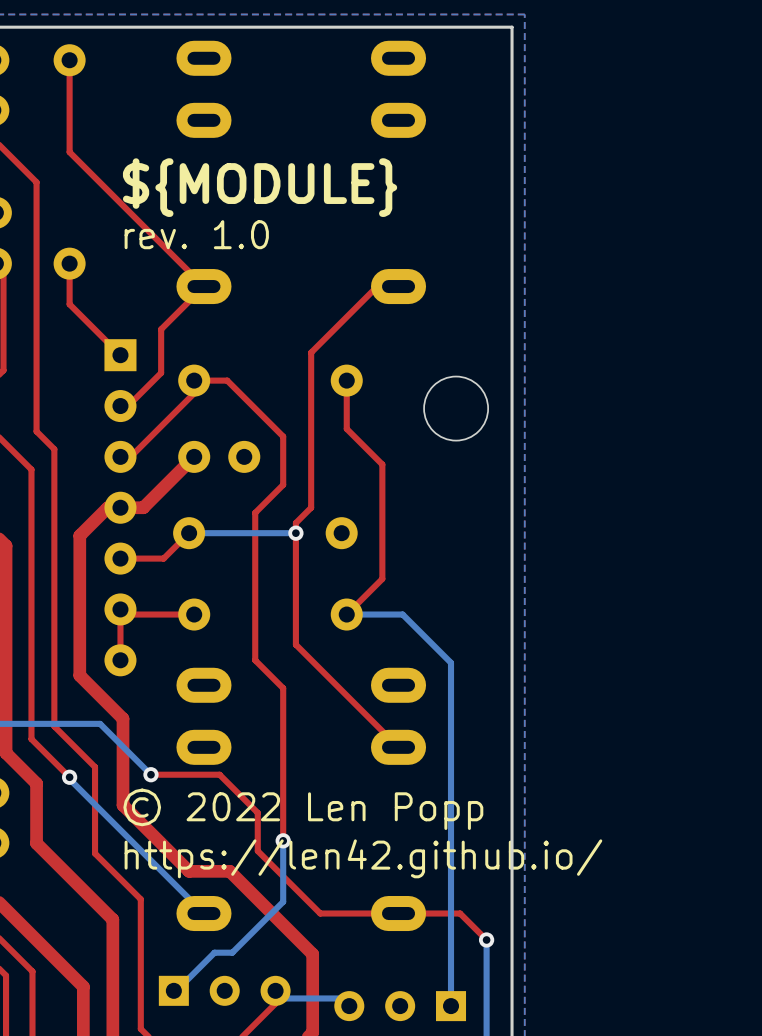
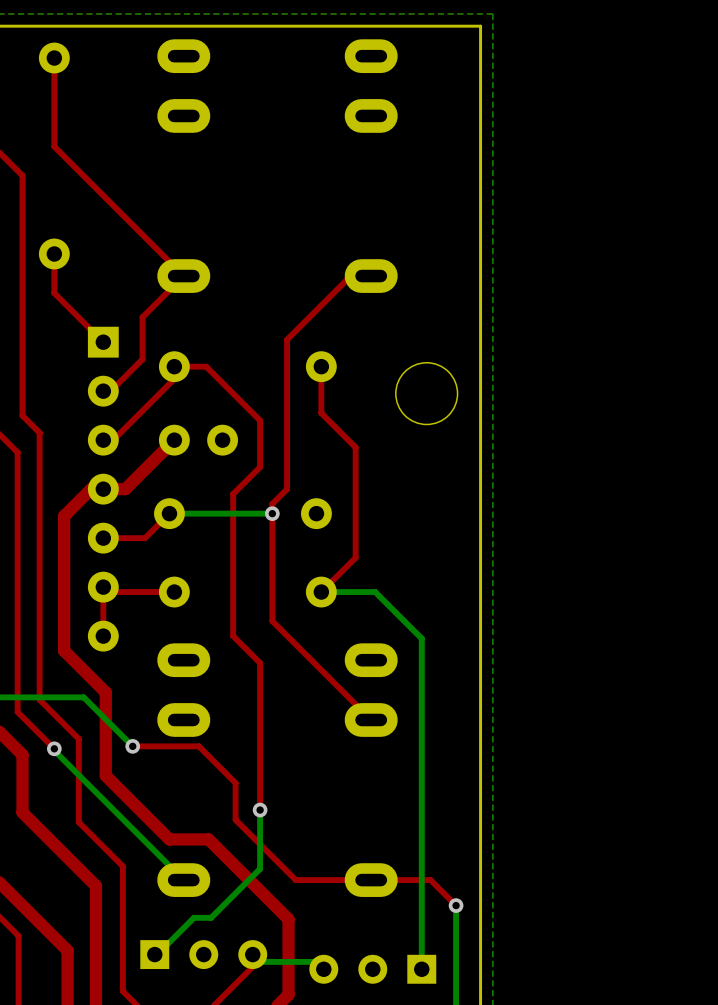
text: ${MODULE} (260, 187) -> none
text: rev. 1.0 (196, 234) -> none
text: © 2022 Len Popp (303, 809) -> none
text: https://len42.github.io/ (363, 858) -> none

